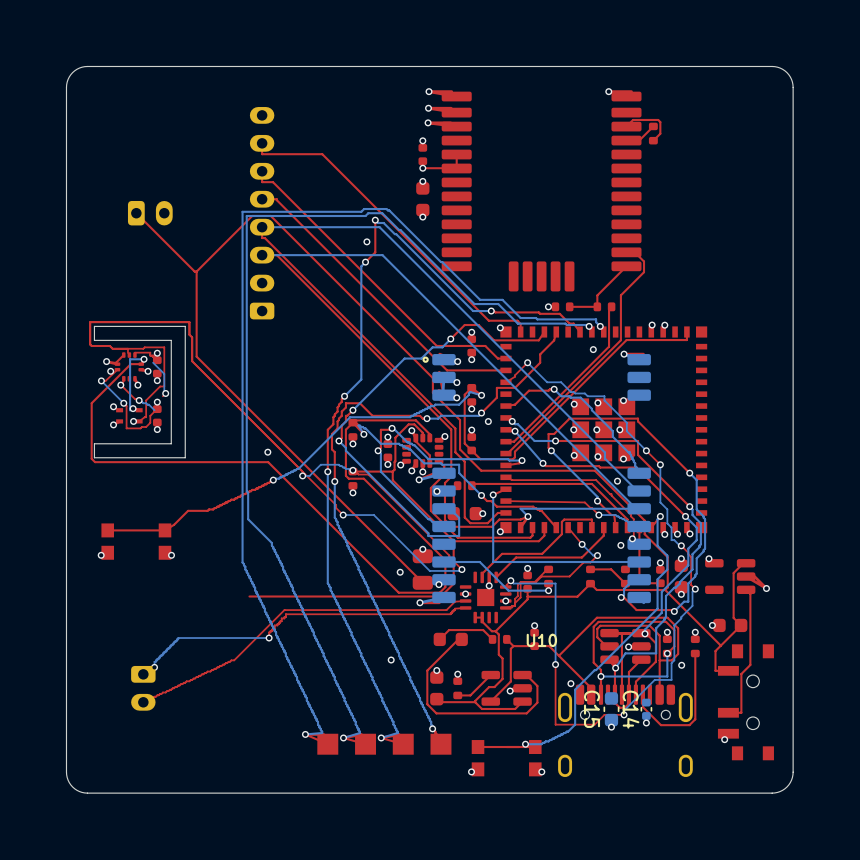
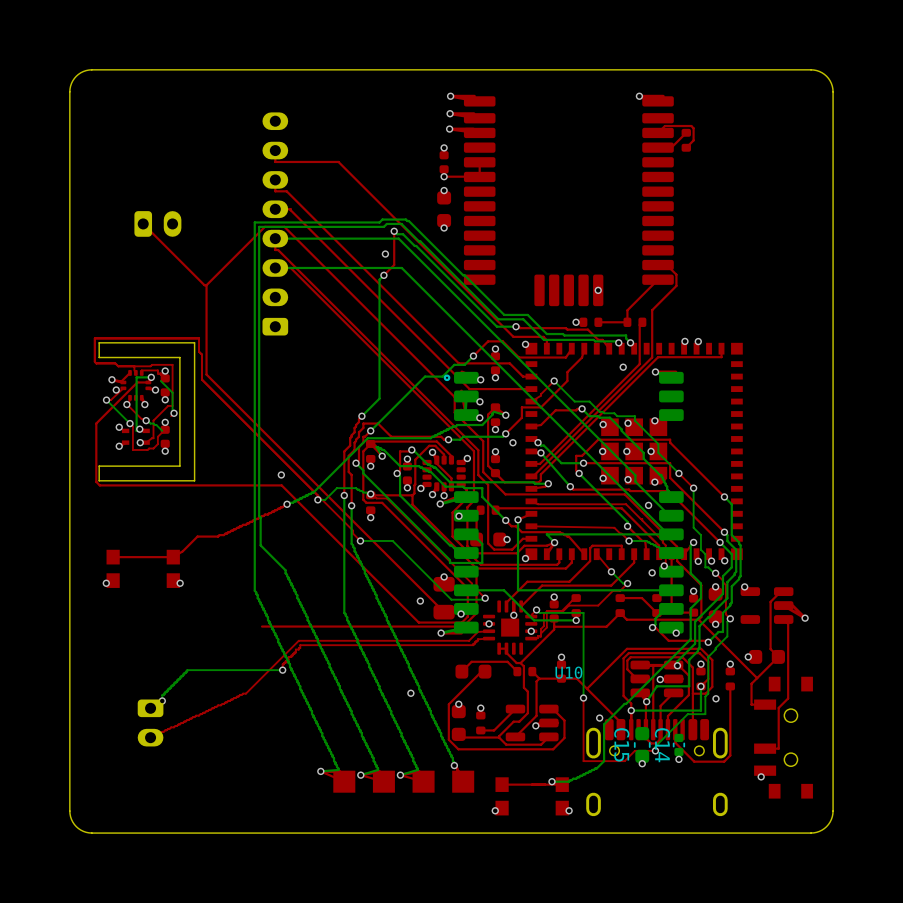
via: none -> (598, 290)
via: none -> (676, 633)

